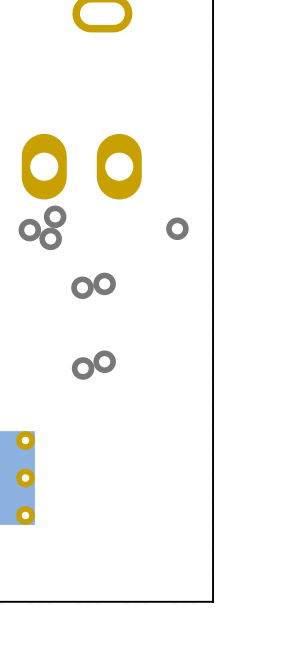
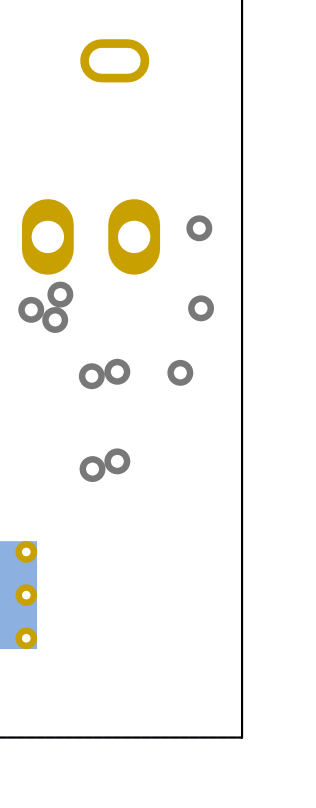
via: none -> (199, 228)
via: none -> (180, 372)

